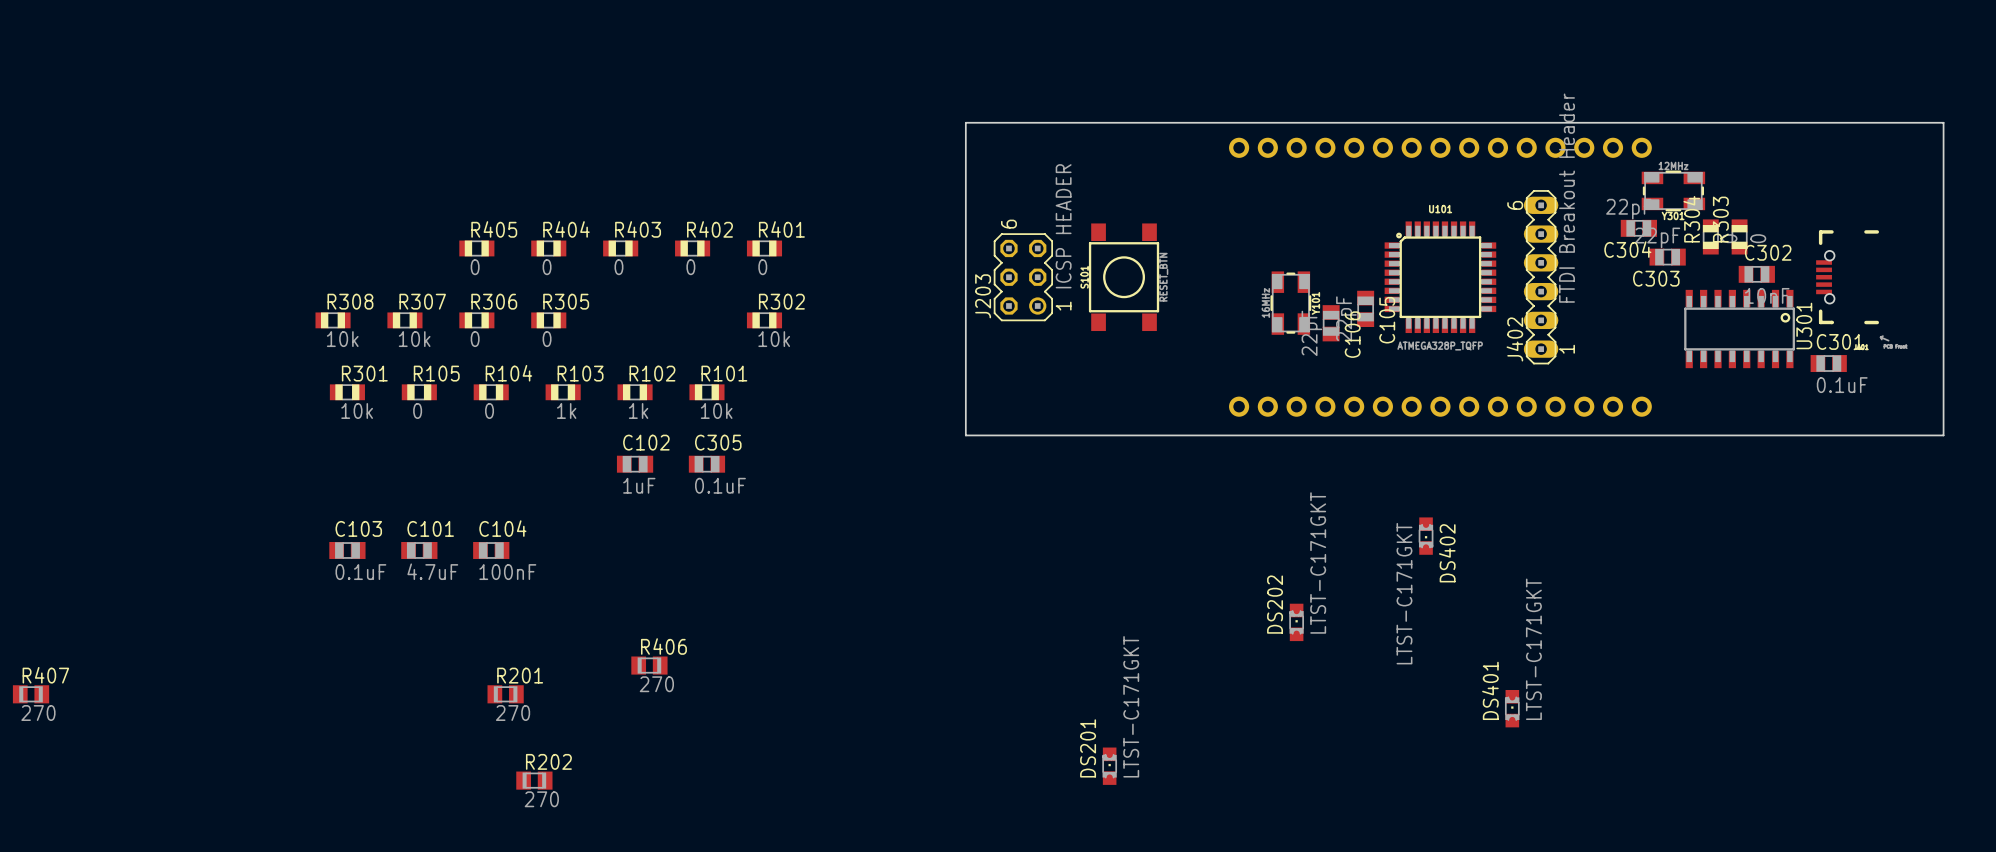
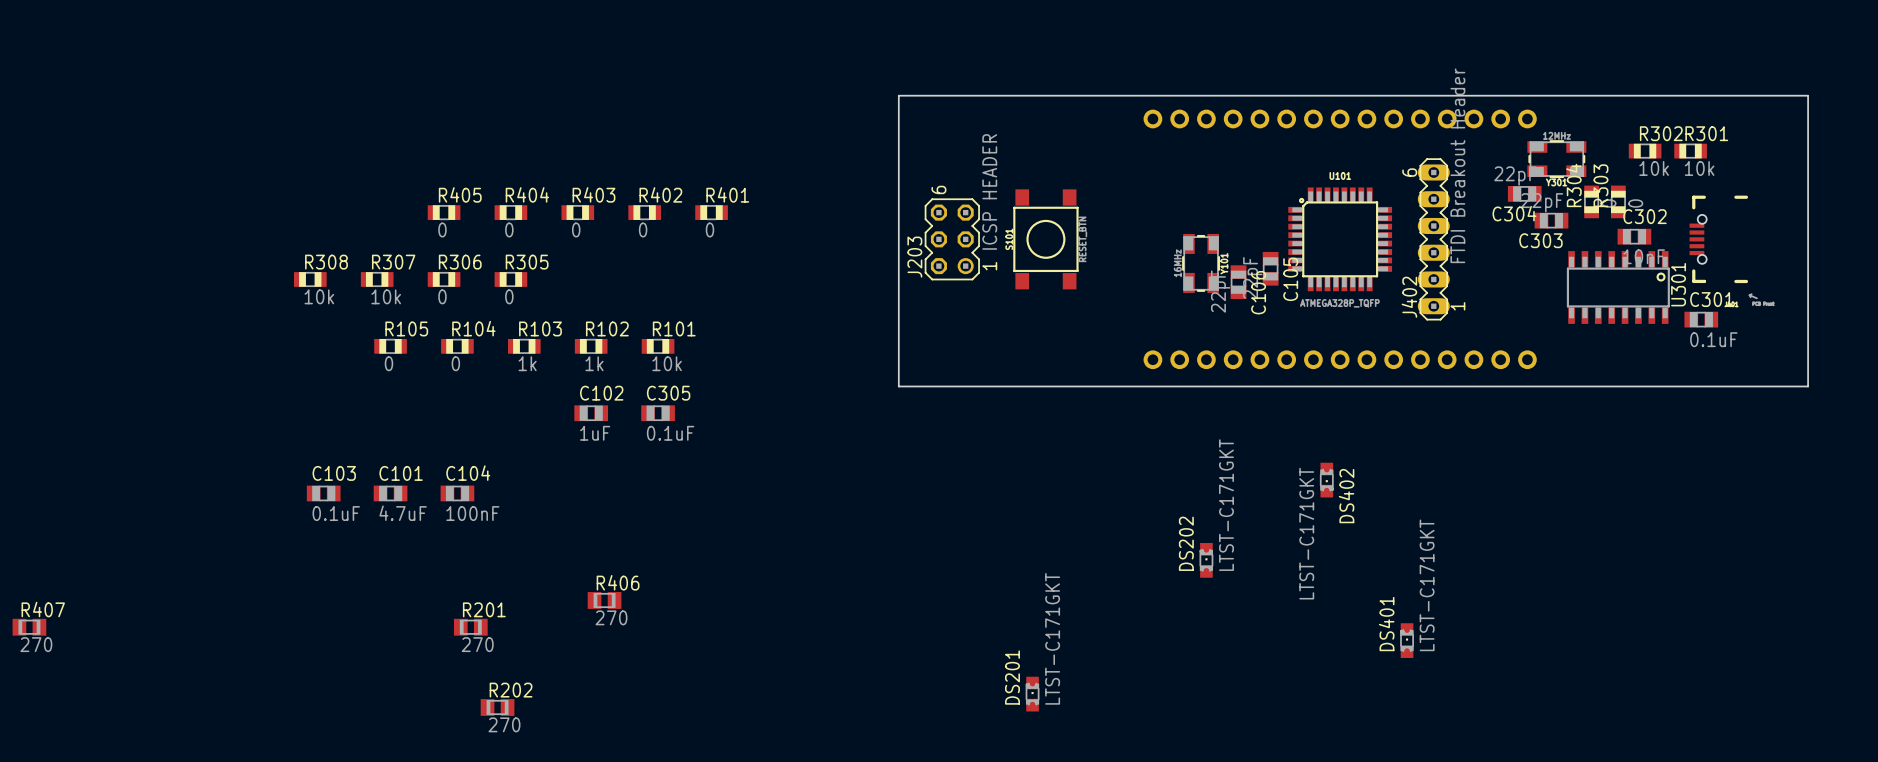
R302 position: (764, 320) -> (1645, 151)
R301 position: (347, 392) -> (1690, 151)

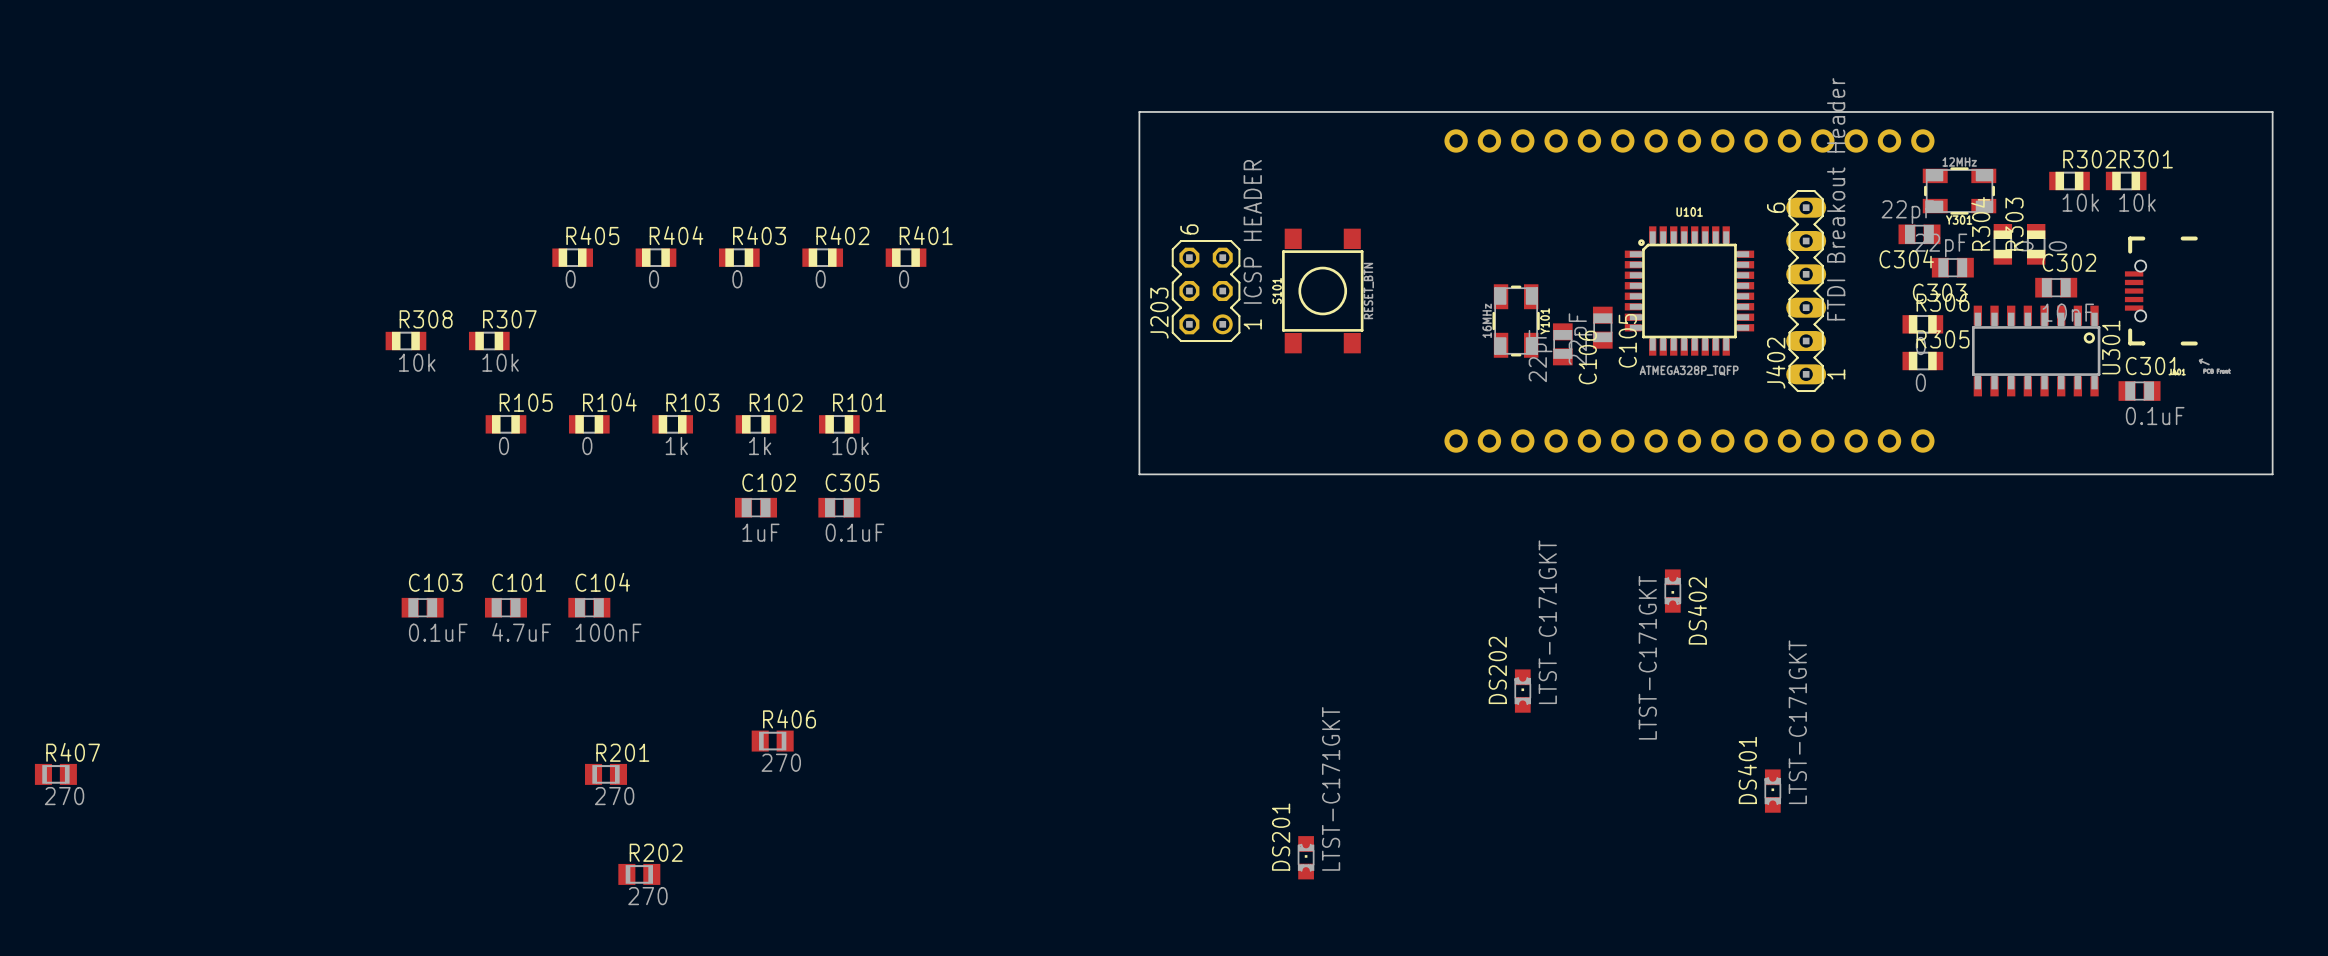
R306 position: (444, 279) -> (1922, 324)
R305 position: (510, 279) -> (1922, 361)

